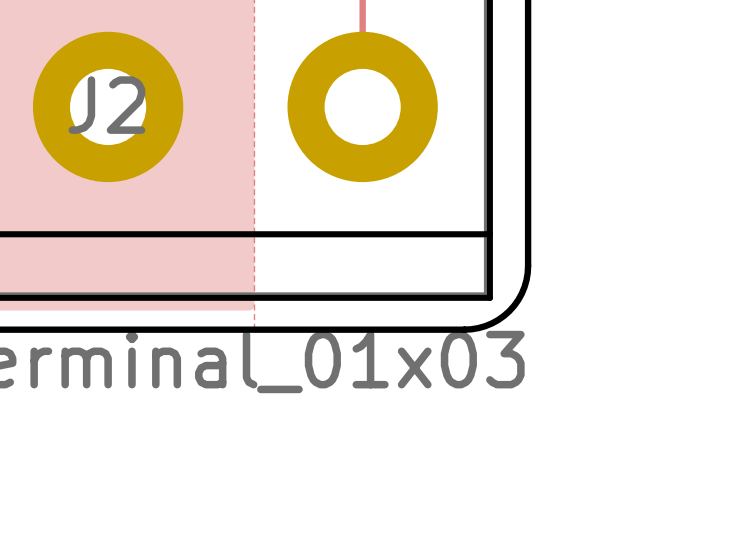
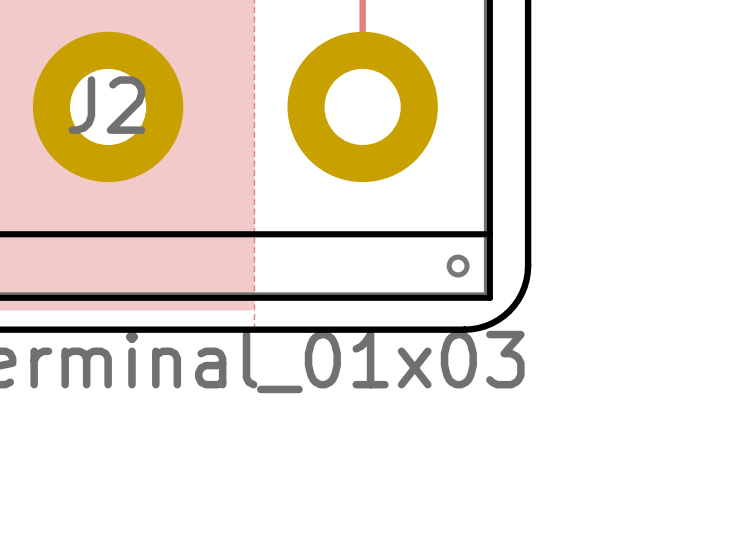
via: none -> (458, 266)

